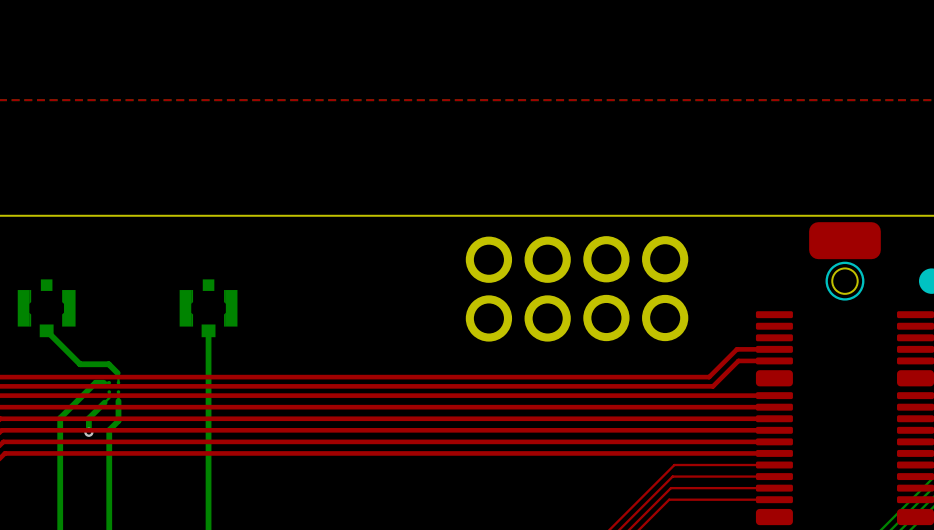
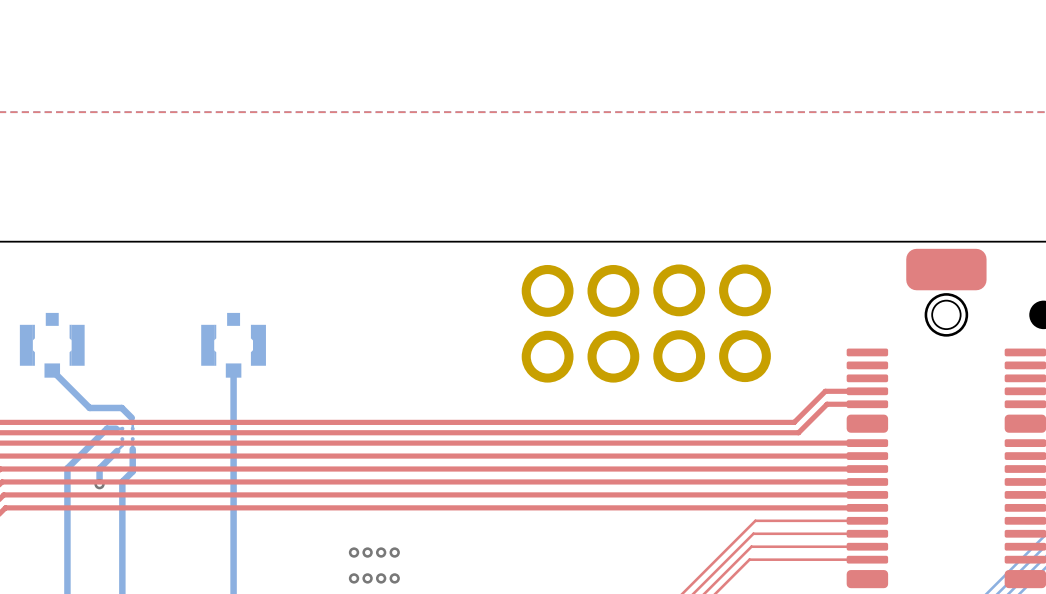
via: none -> (354, 552)
via: none -> (367, 552)
via: none -> (381, 552)
via: none -> (394, 552)
via: none -> (354, 578)
via: none -> (367, 578)
via: none -> (381, 578)
via: none -> (394, 578)

